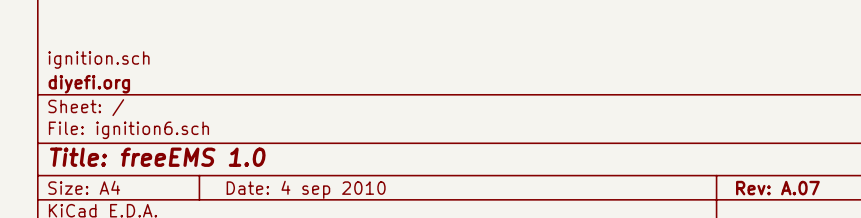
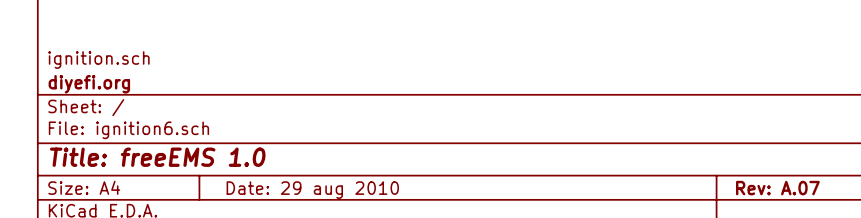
title block: Date: 4 sep 2010 (306, 189) -> Date: 29 aug 2010 (312, 190)

